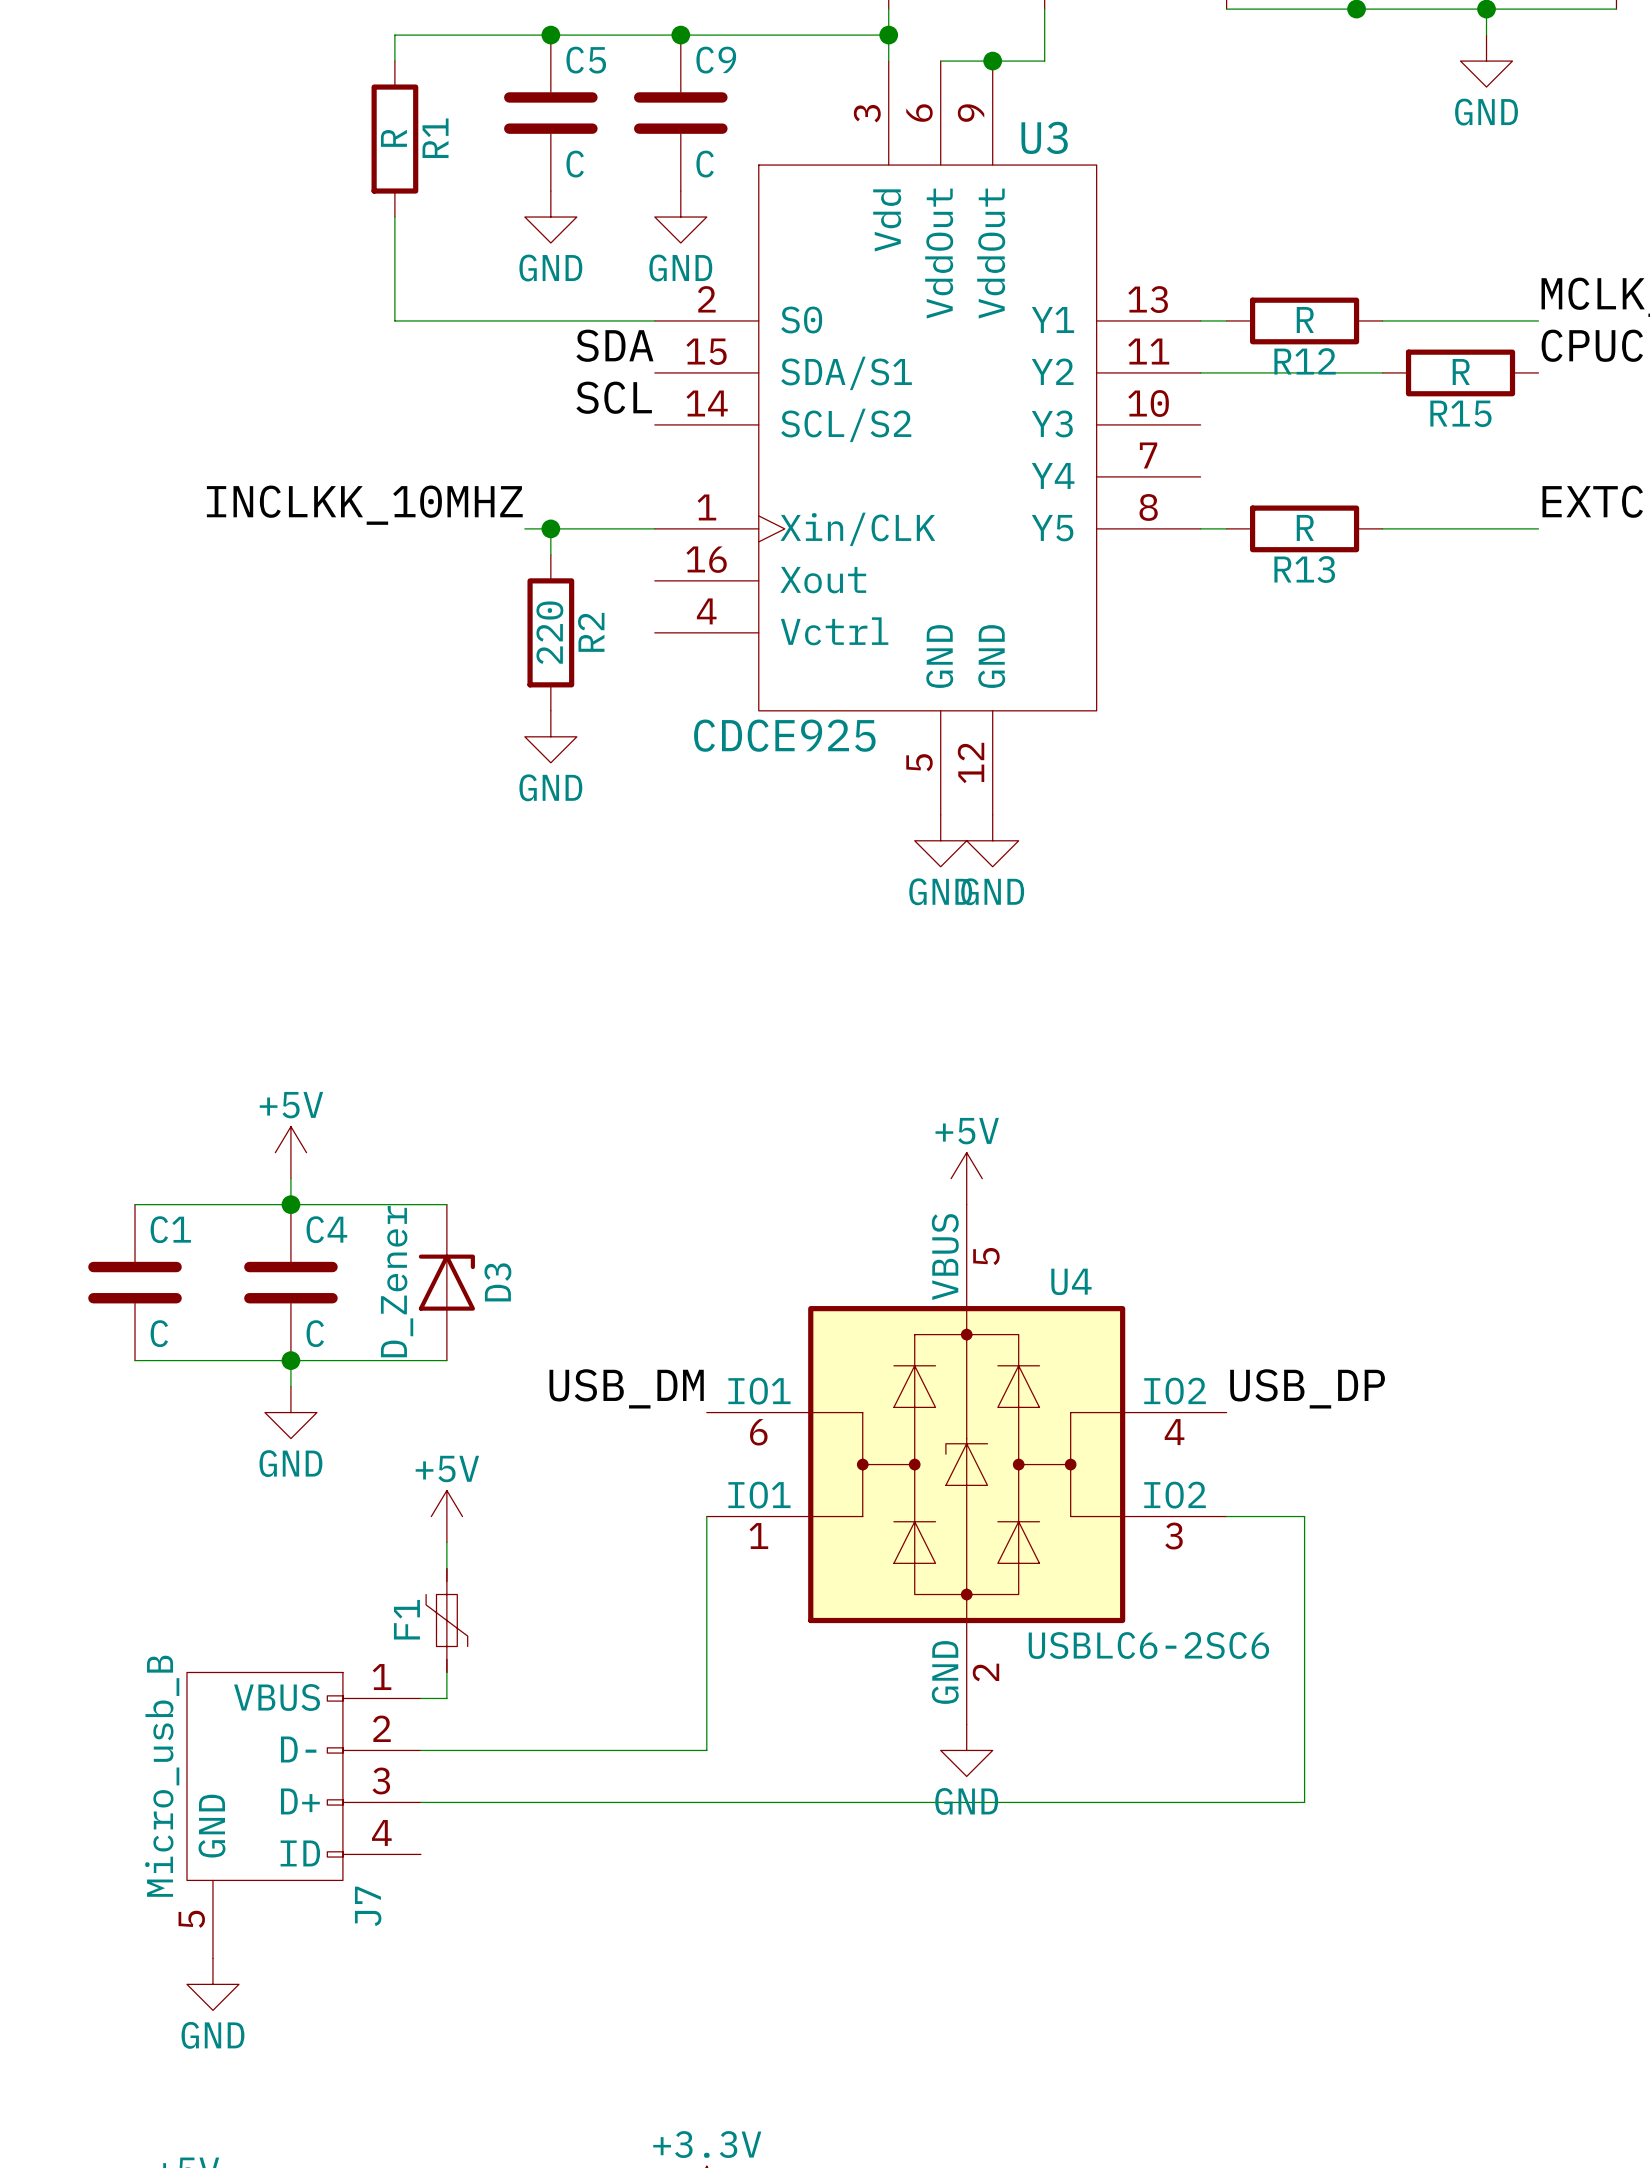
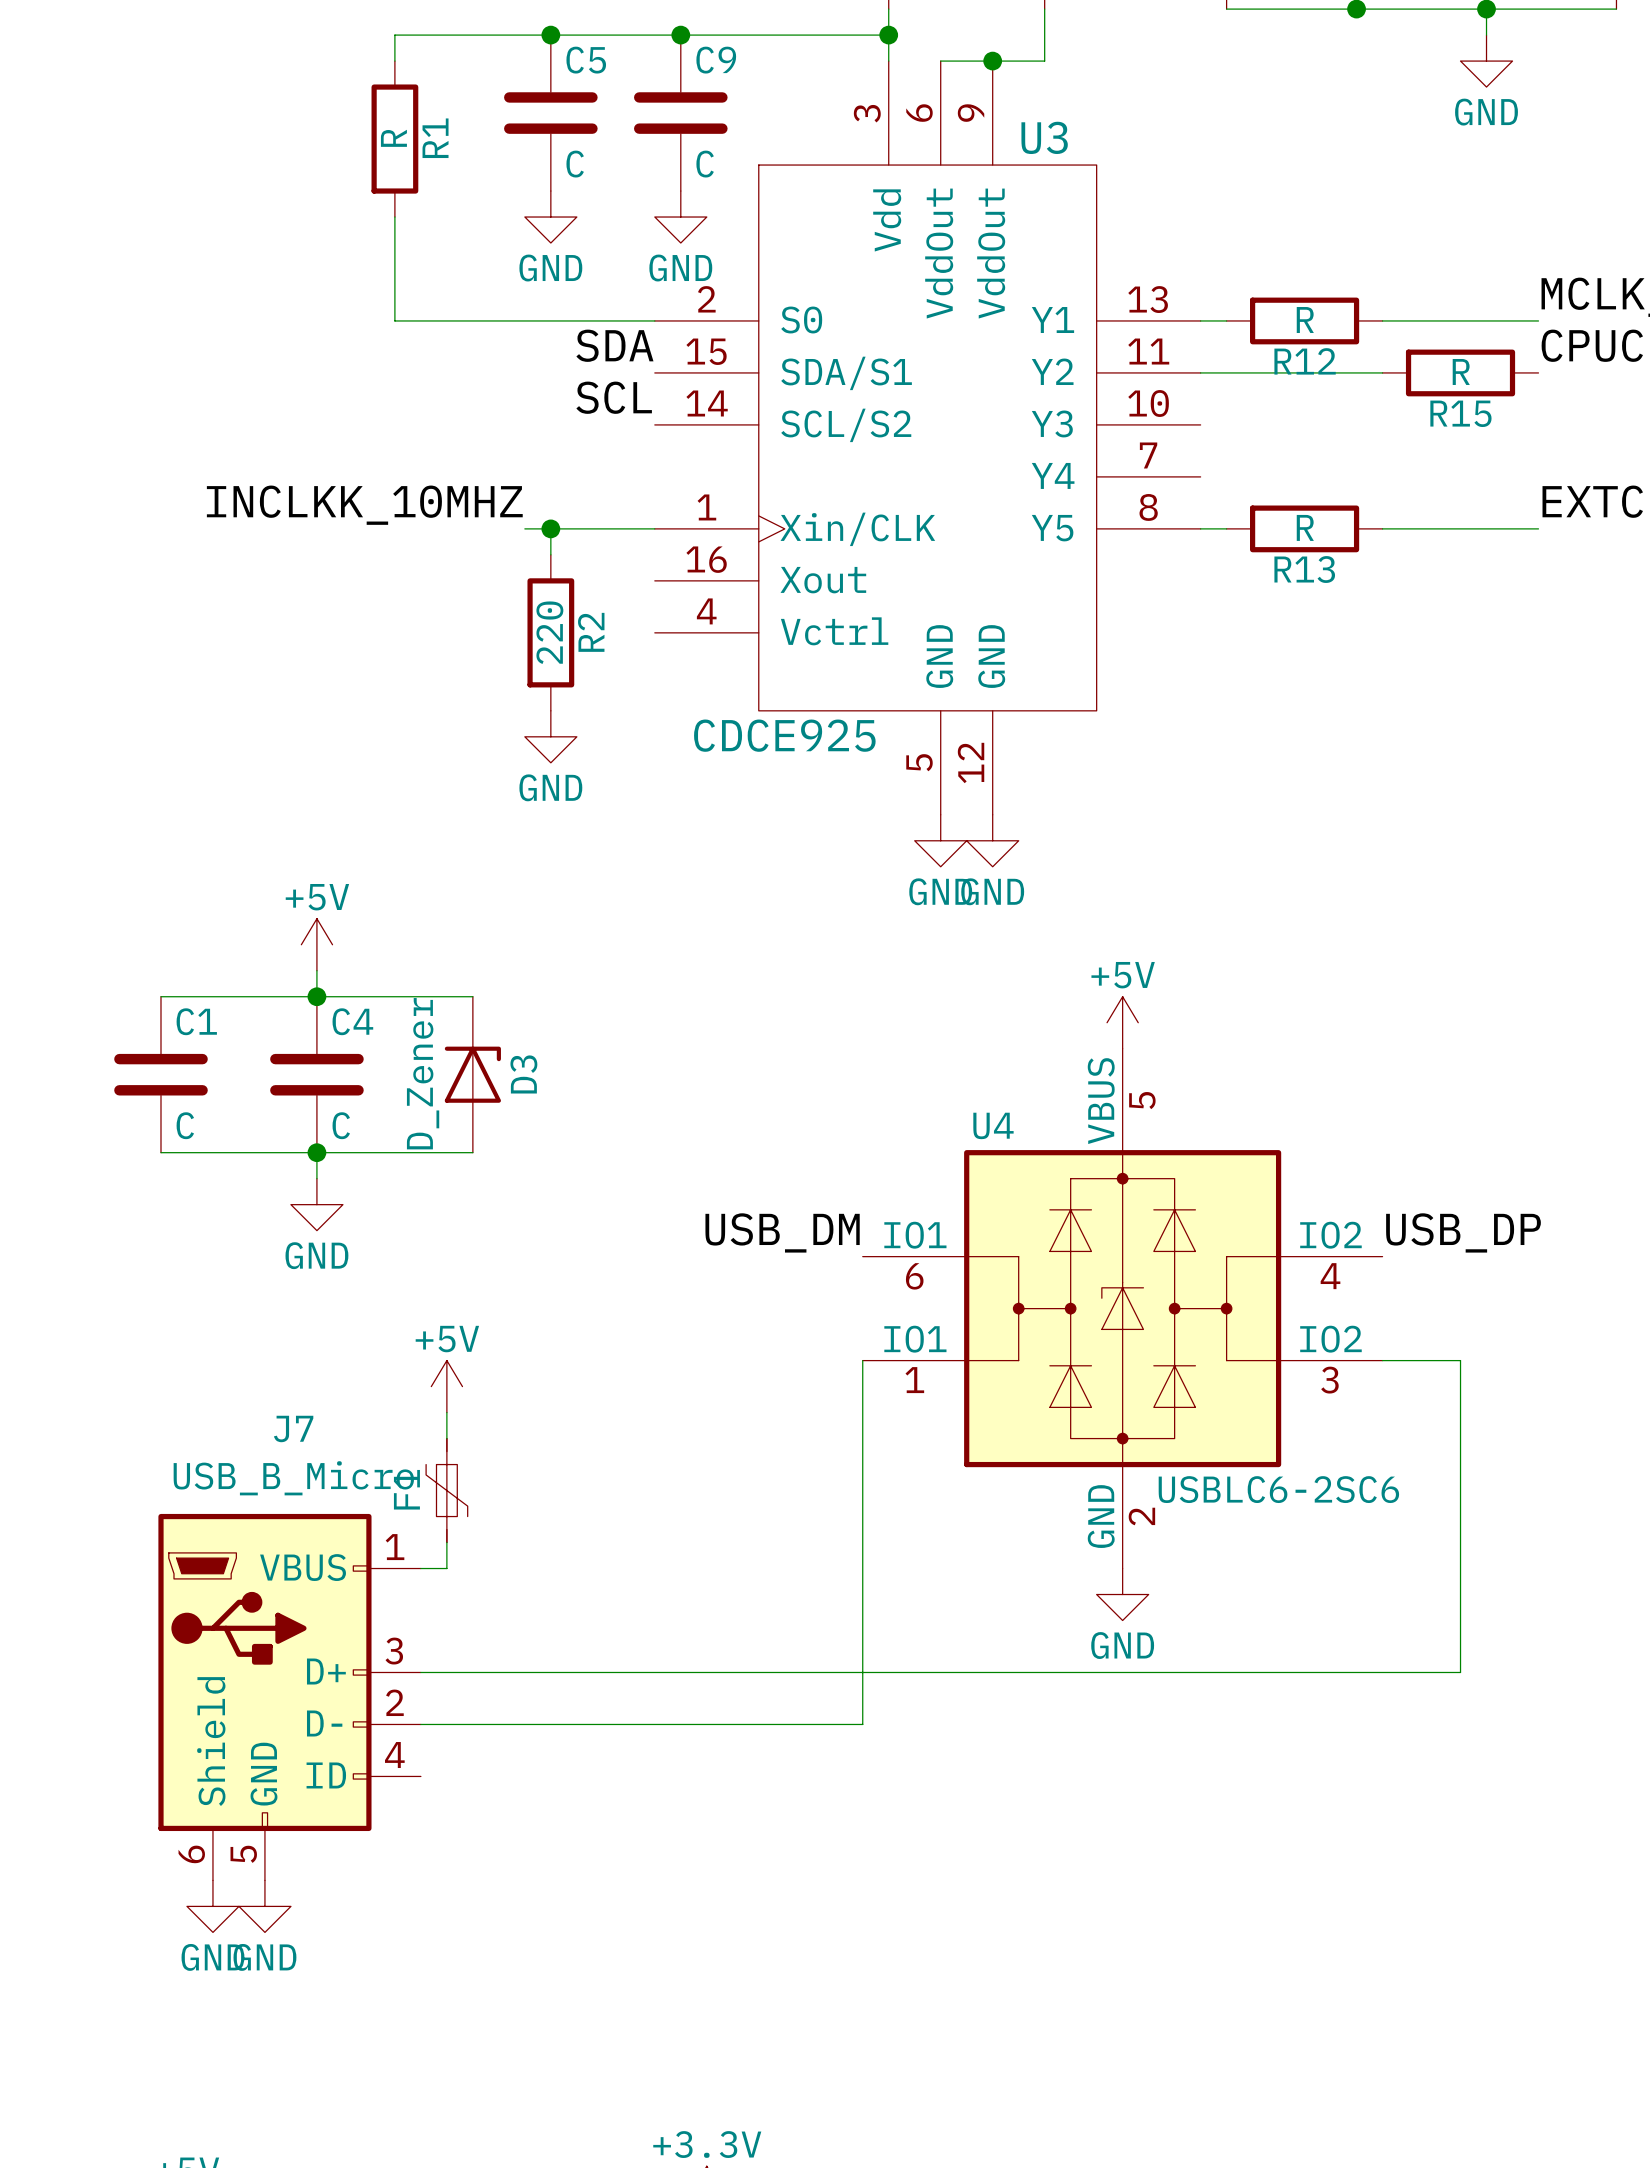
power symbol: none -> +5V (316, 944)
junction: none -> (316, 996)
power symbol: +5V (290, 1152) -> none
wire: (290, 1178) (290, 1204) -> (316, 970) (316, 996)
power symbol position: +5V (966, 1178) -> +5V (1122, 1022)
wire: (135, 1204) (446, 1204) -> (160, 996) (472, 996)
junction position: (290, 1204) -> (316, 1152)
U4 name position: U4 (1071, 1281) -> U4 (993, 1125)
C1 position: (135, 1282) -> (160, 1074)
C4 position: (290, 1282) -> (316, 1074)
D3 position: (446, 1282) -> (472, 1074)
wire: (135, 1360) (446, 1360) -> (160, 1152) (472, 1152)
wire: (290, 1360) (290, 1386) -> (316, 1152) (316, 1178)
junction: (290, 1360) -> none
wire: none -> (862, 1360) (862, 1724) (420, 1724)
wire: none -> (1382, 1360) (1460, 1360) (1460, 1672) (420, 1672)
label position: USB_DM (626, 1388) -> USB_DM (782, 1232)
label position: USB_DP (1307, 1388) -> USB_DP (1463, 1232)
power symbol position: GND (290, 1412) -> GND (316, 1204)
wire: none -> (446, 1412) (446, 1438)
U4 position: (966, 1464) -> (1122, 1308)
power symbol position: +5V (446, 1516) -> +5V (446, 1386)
wire: (706, 1516) (706, 1750) (420, 1750) -> none
wire: (1226, 1516) (1304, 1516) (1304, 1802) (420, 1802) -> none
wire: none -> (420, 1568) (446, 1568)
F1 position: (446, 1620) -> (446, 1490)
U4 value position: USBLC6-2SC6 (1148, 1645) -> USBLC6-2SC6 (1278, 1489)
J7 symbol: [186, 1672, 421, 1959] -> [158, 1513, 421, 1881]
wire: (446, 1672) (446, 1698) (420, 1698) -> none
power symbol position: GND (966, 1750) -> GND (1122, 1594)
J7 value: Micro_usb_B (162, 1776) -> USB_B_Micro (293, 1478)
power symbol: none -> GND (212, 1906)
power symbol: none -> GND (264, 1906)
J7 name position: J7 (368, 1906) -> J7 (293, 1428)
power symbol: GND (212, 1984) -> none

